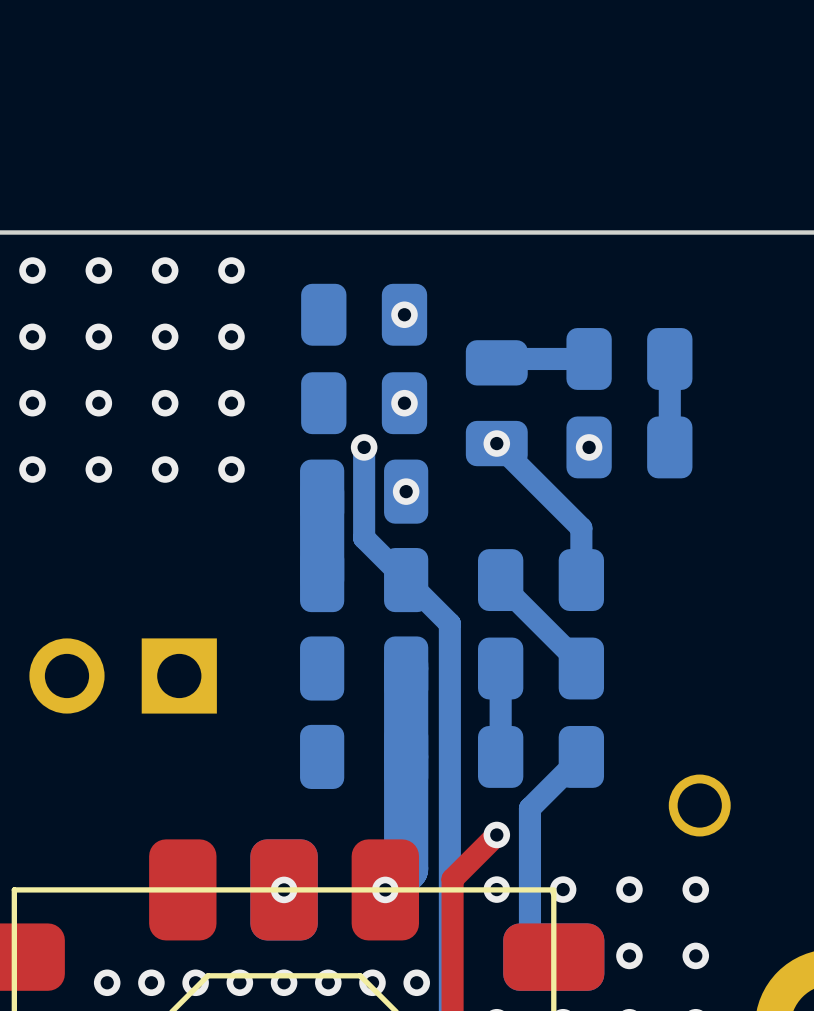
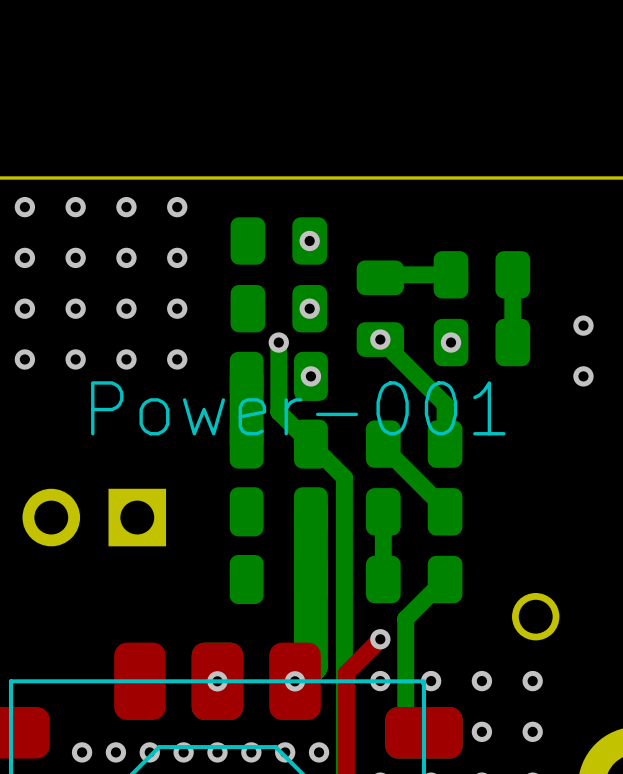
via: none -> (583, 325)
via: none -> (583, 376)
text: none -> Power-001 (298, 408)

